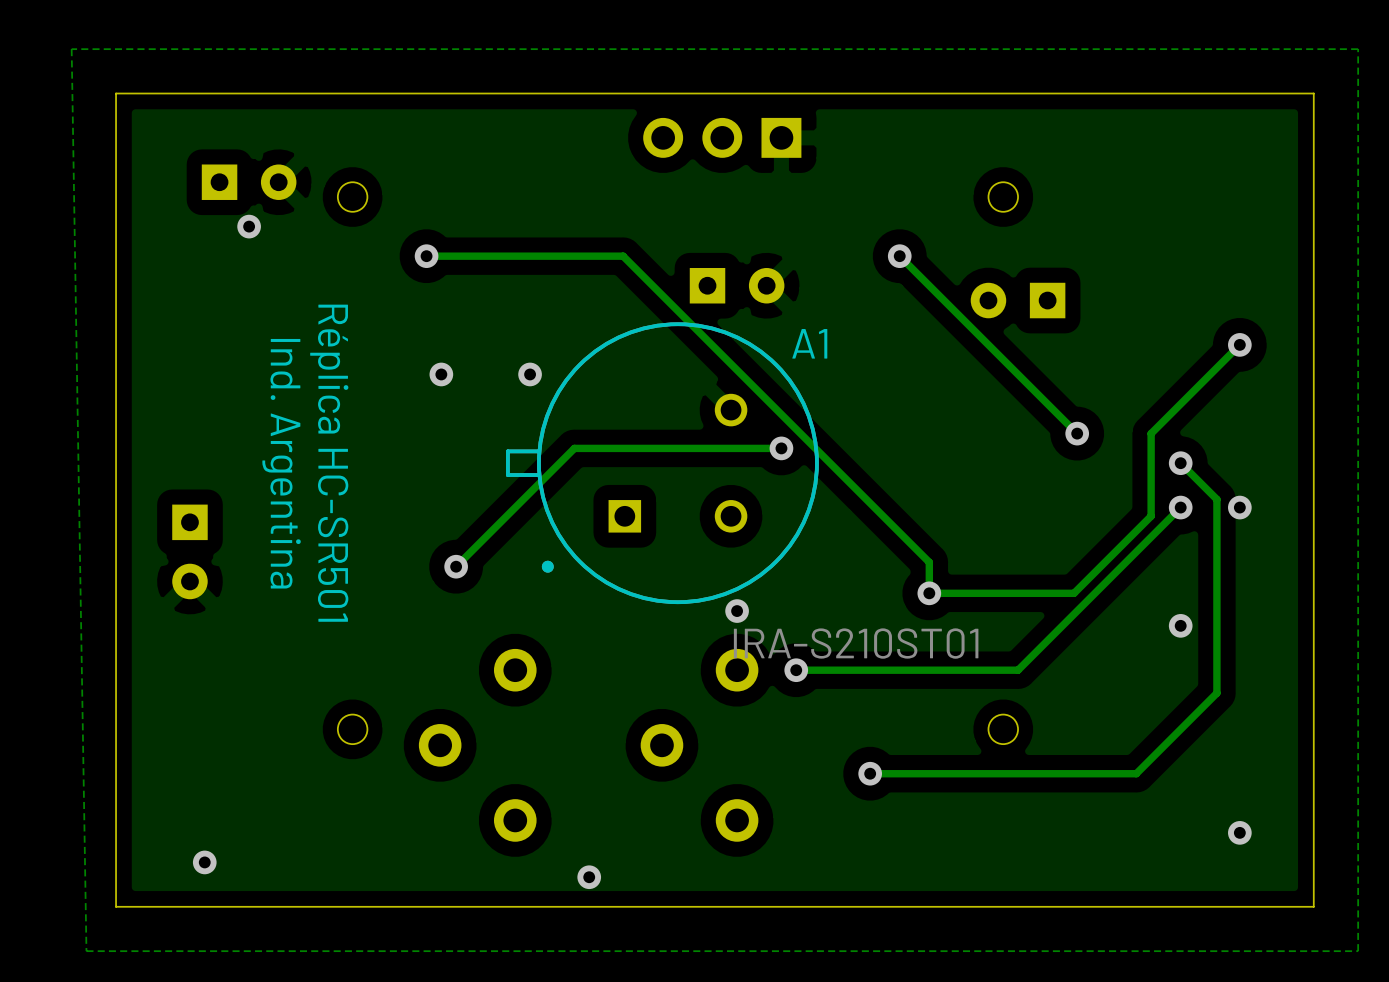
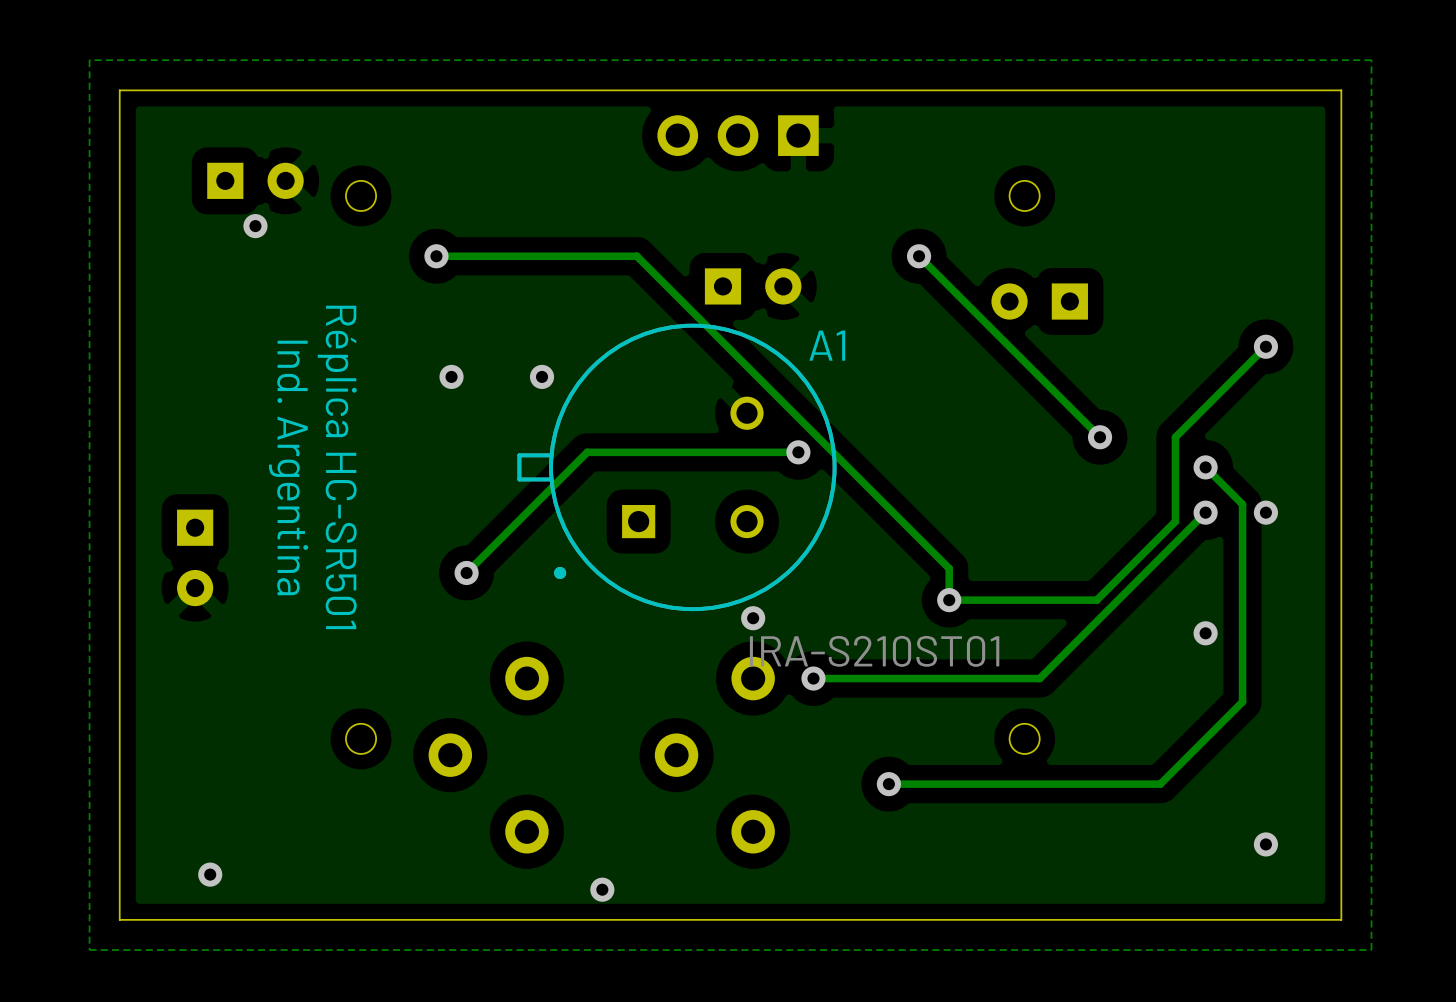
zone outline: (1358, 49) (1358, 951) (86, 951) (71, 49) (1358, 49) -> (1371, 60) (1371, 950) (89, 950) (89, 60) (1371, 60)

